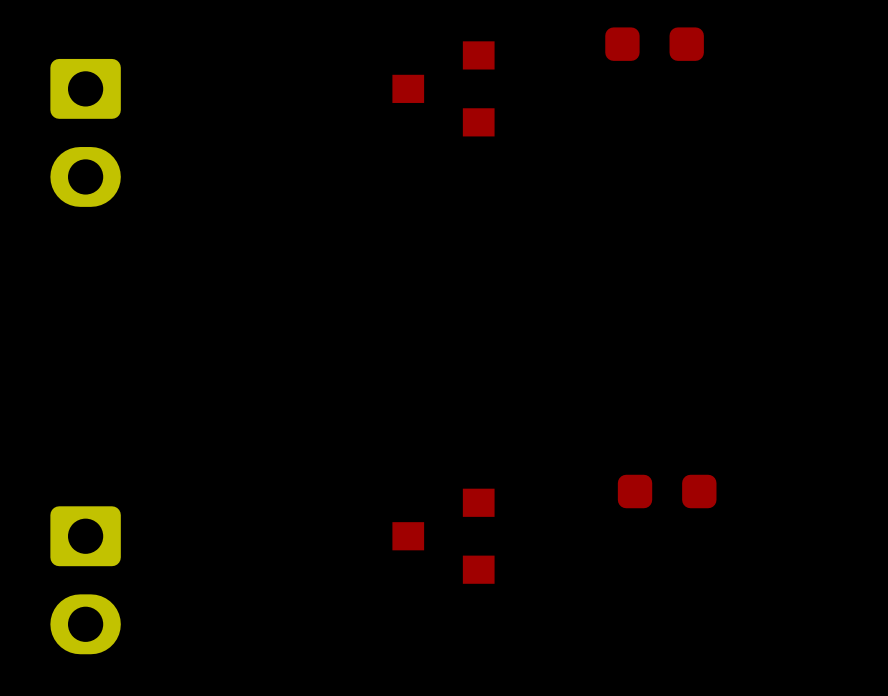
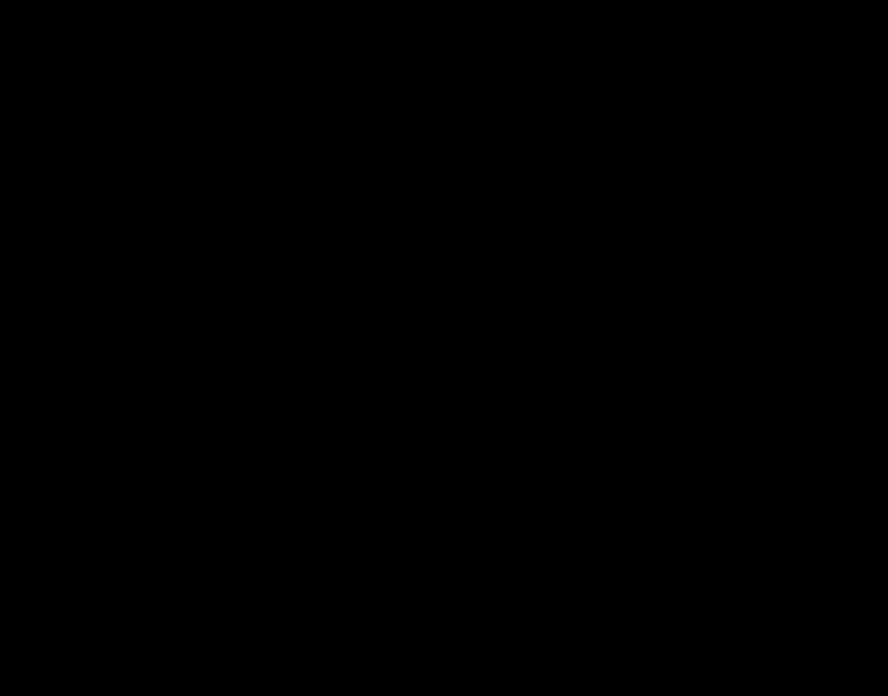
part: (654, 44) -> none
part: (443, 88) -> none
part: (85, 132) -> none
part: (667, 491) -> none
part: (443, 536) -> none
part: (85, 580) -> none

